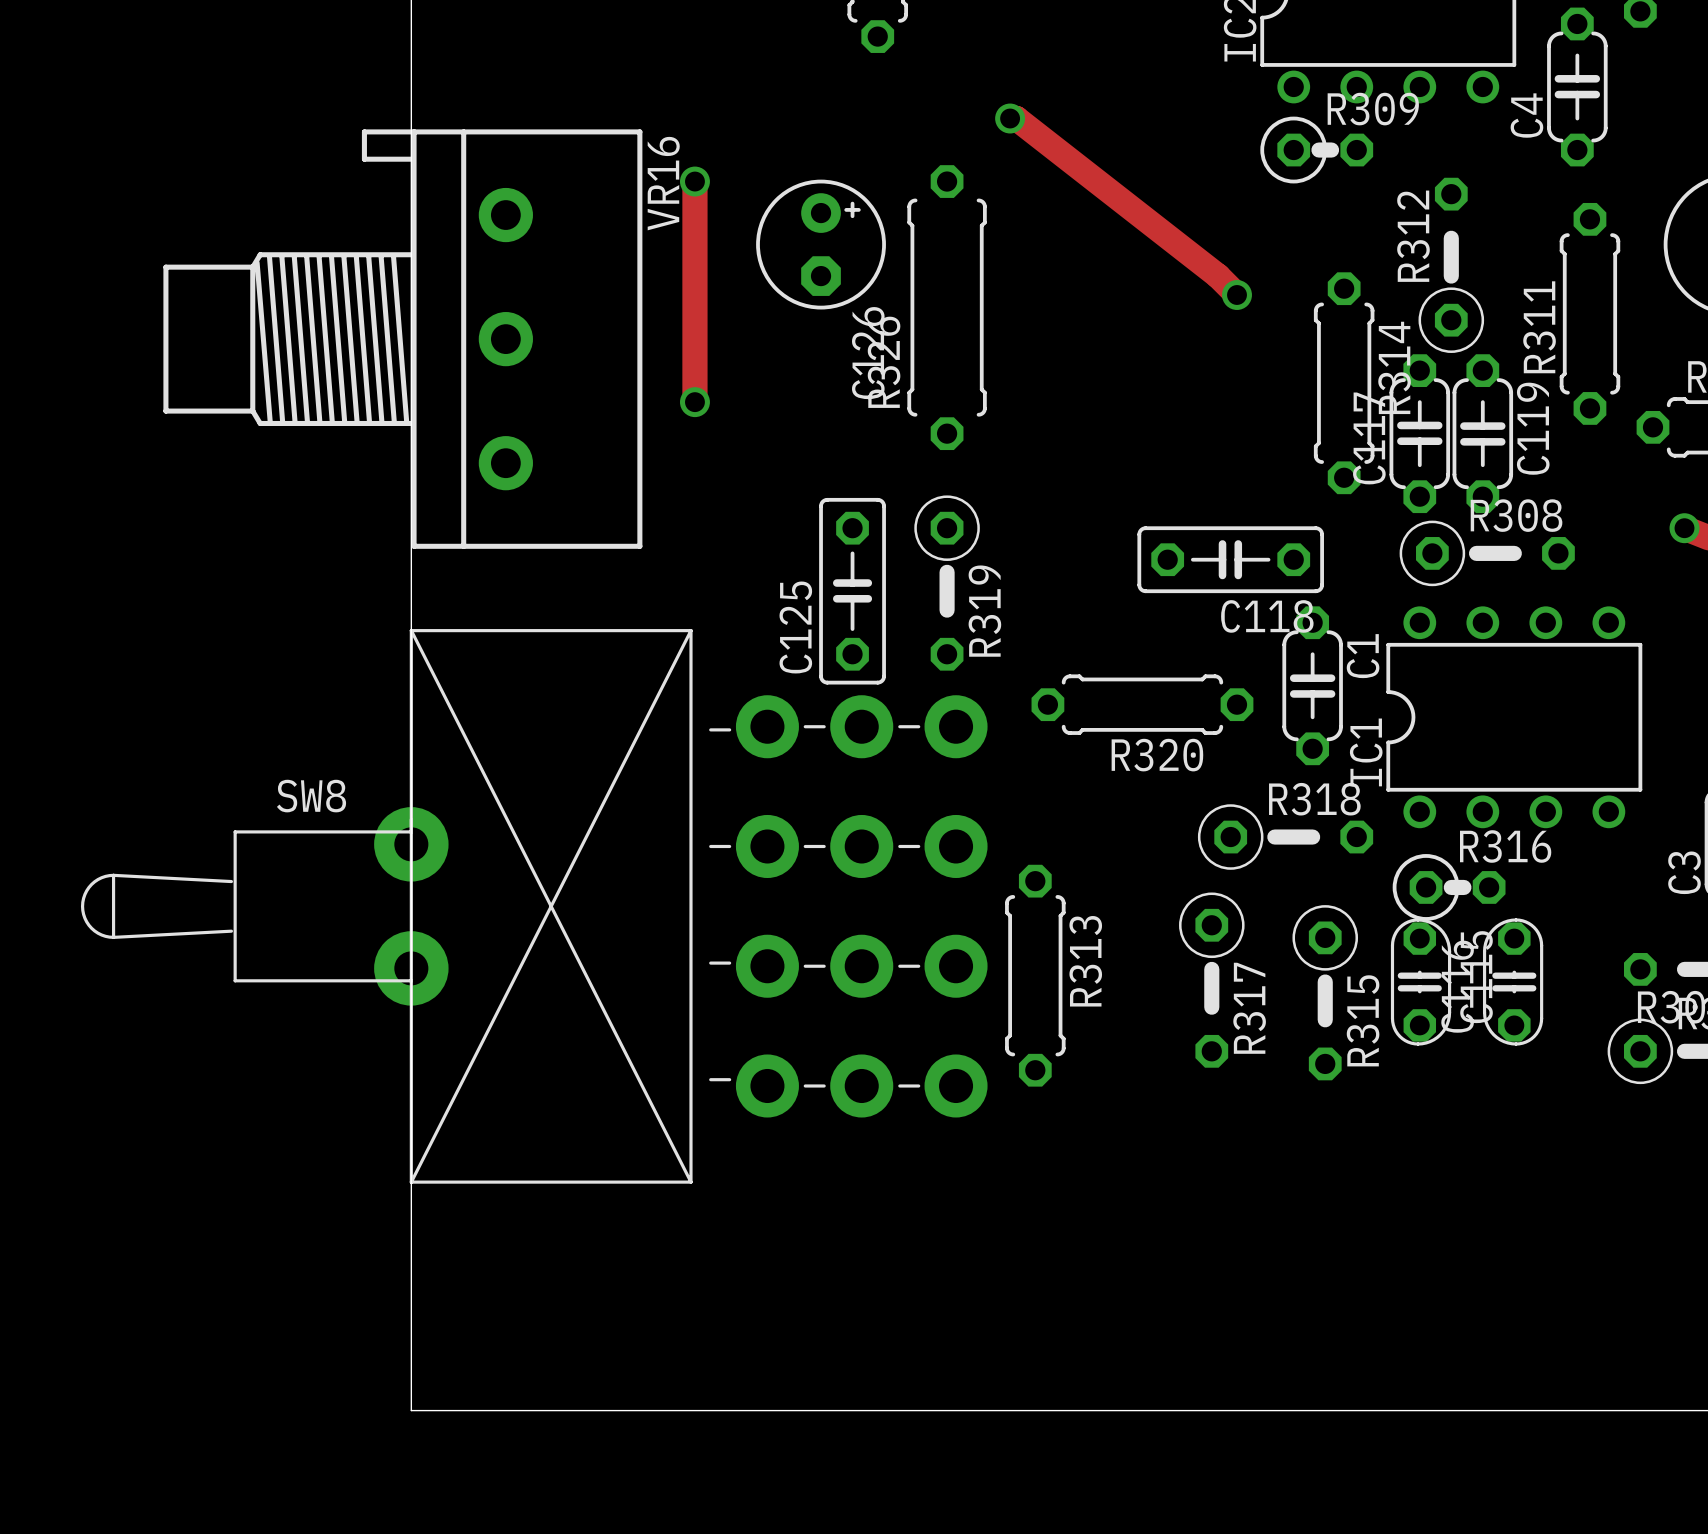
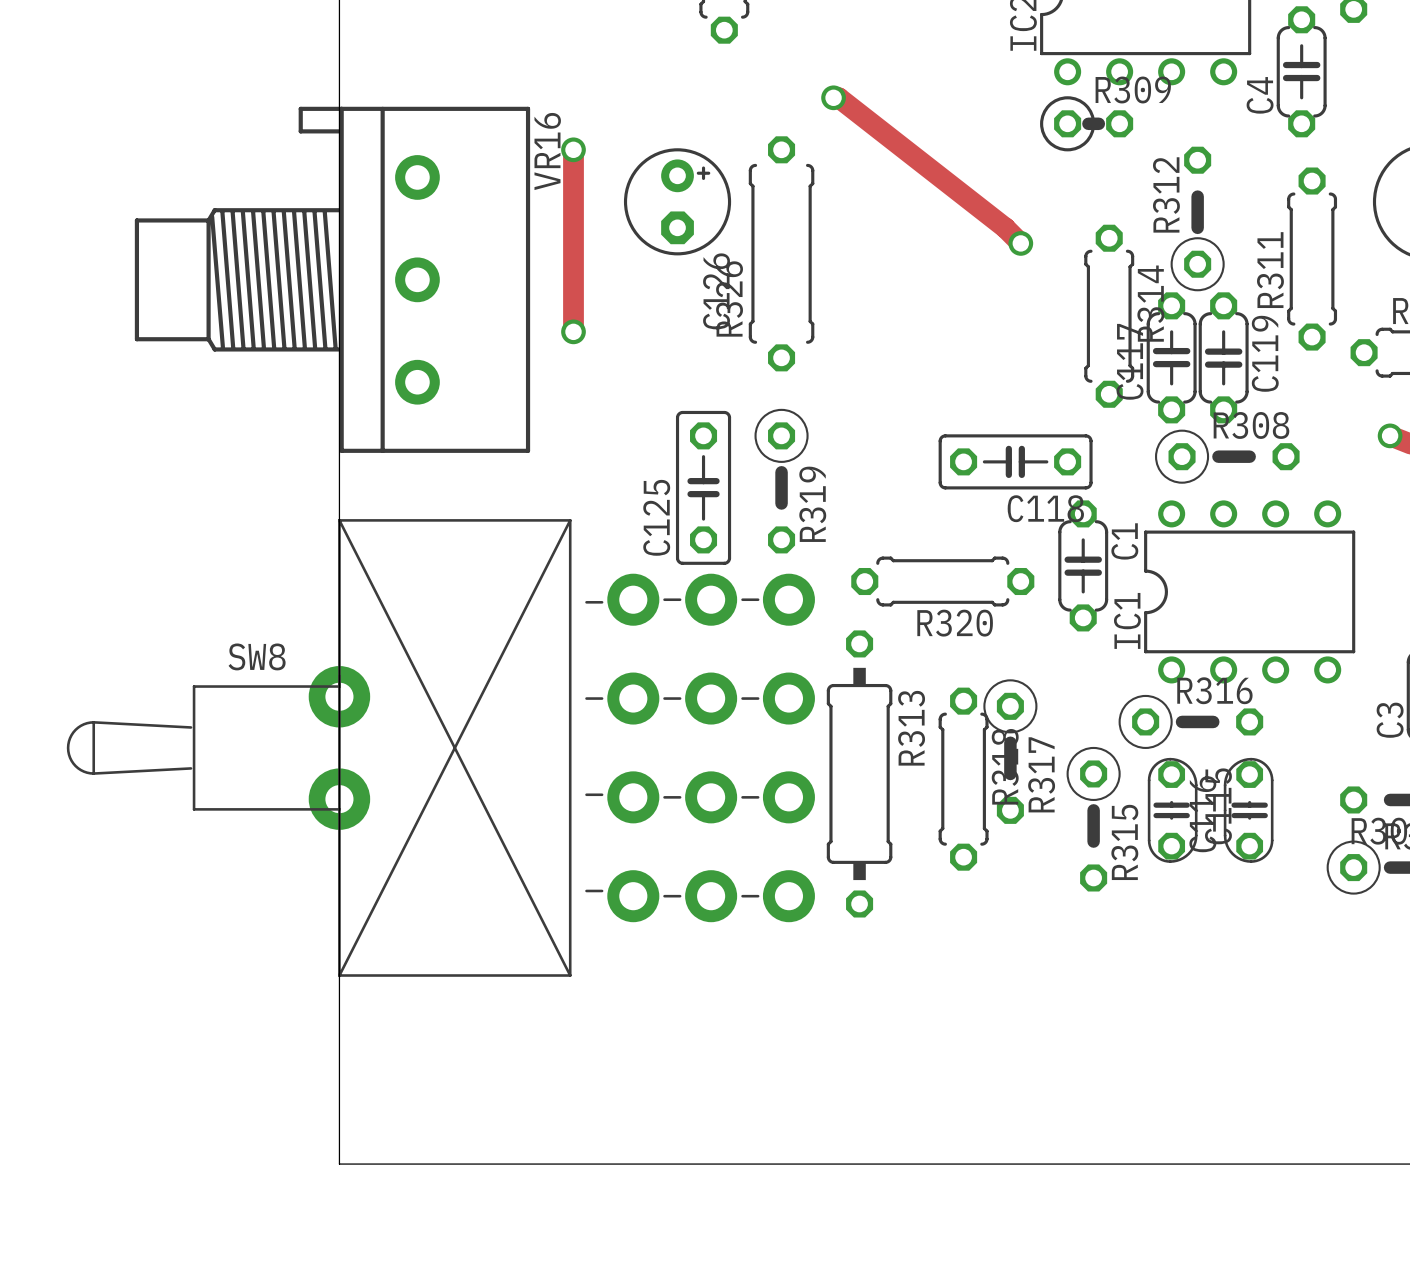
R318 footprint: [1197, 804, 1374, 870] -> [938, 687, 989, 871]
R316 footprint: [1392, 854, 1506, 921] -> [1118, 694, 1264, 749]
R313 footprint: [1005, 864, 1066, 1087] -> [826, 630, 893, 918]
R317 position: (1211, 980) -> (1010, 751)

